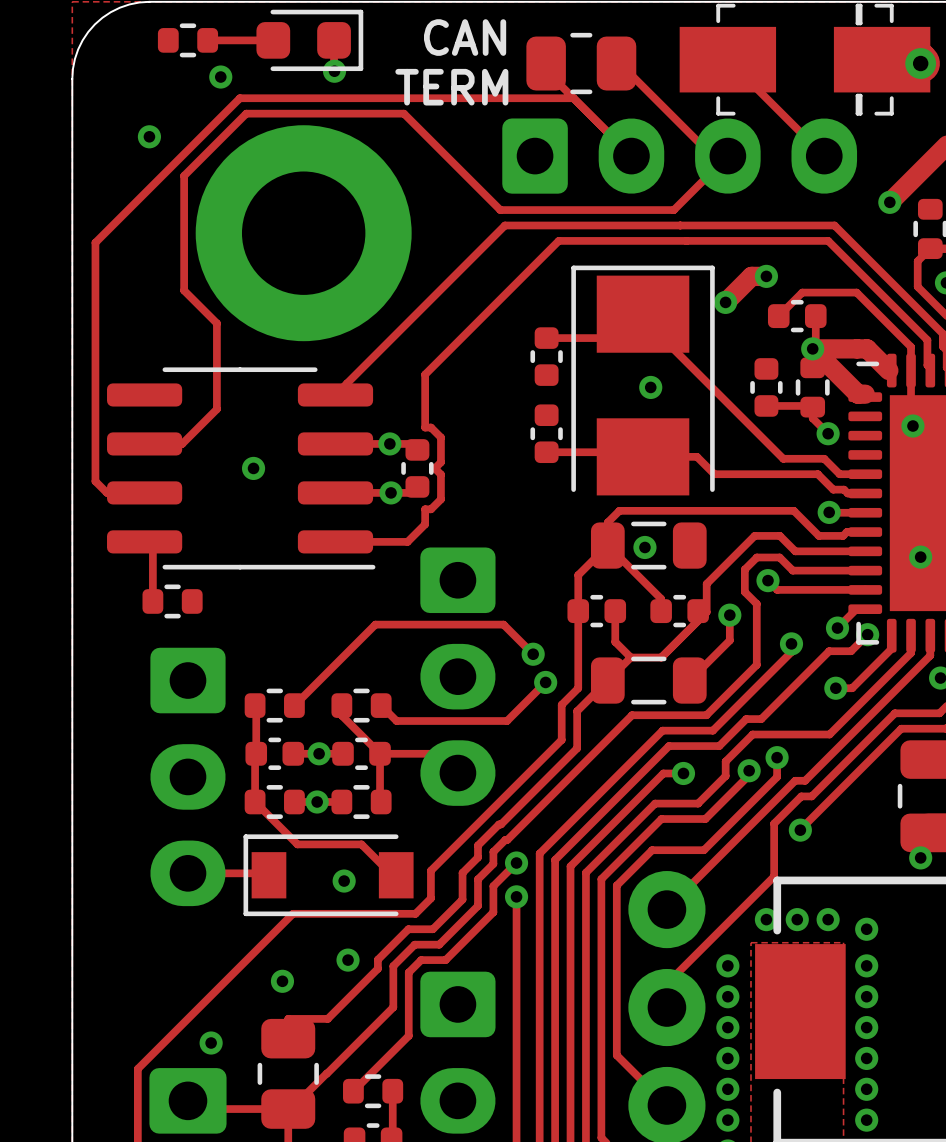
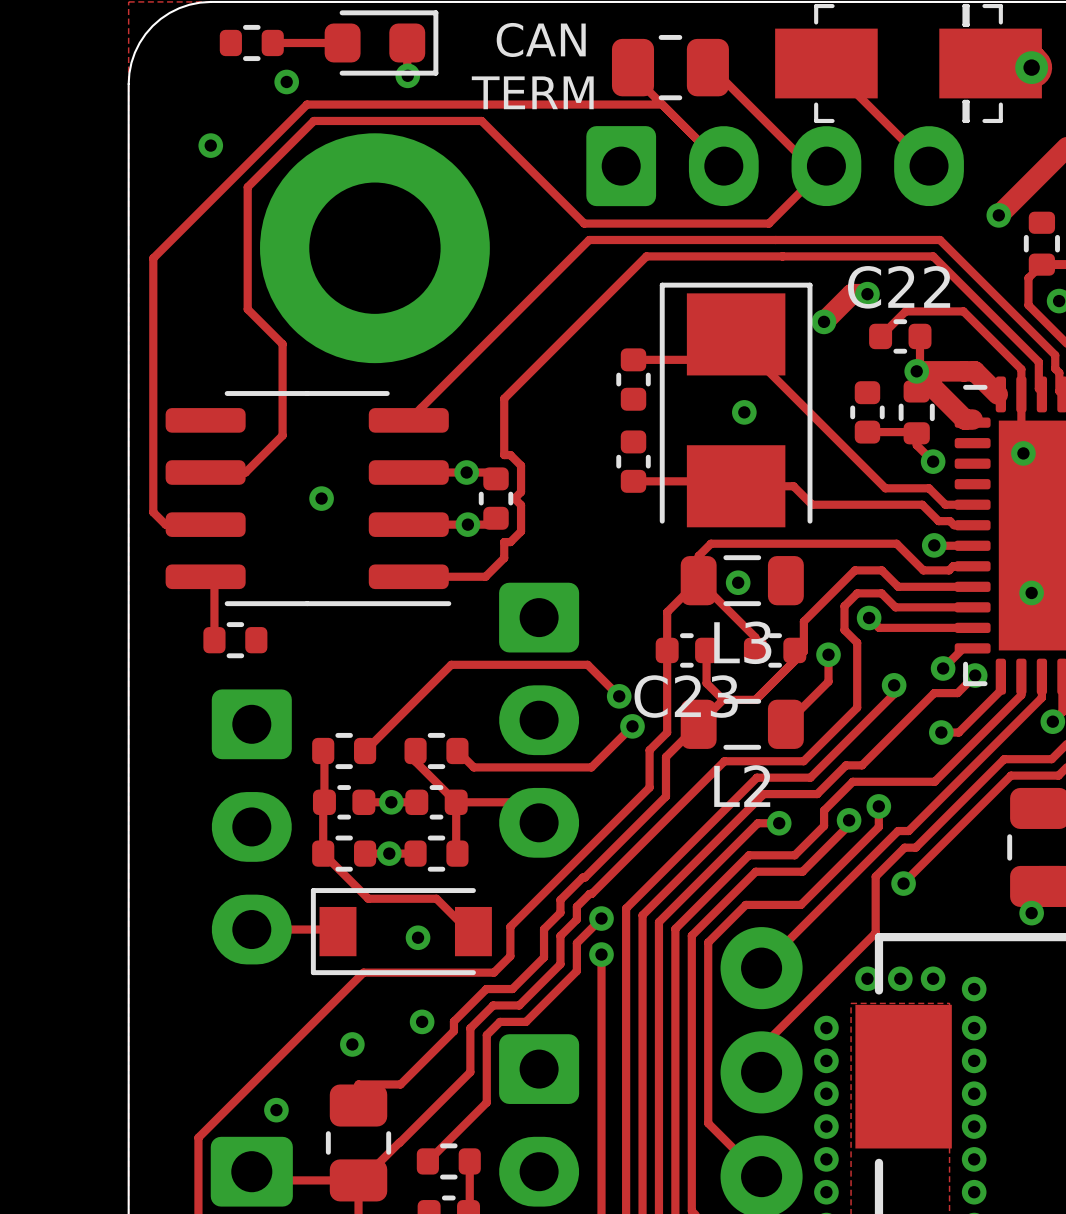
C22 name: none -> C22 (899, 287)
L3 name: none -> L3 (742, 642)
C23 name: none -> C23 (686, 696)
L2 name: none -> L2 (742, 786)

